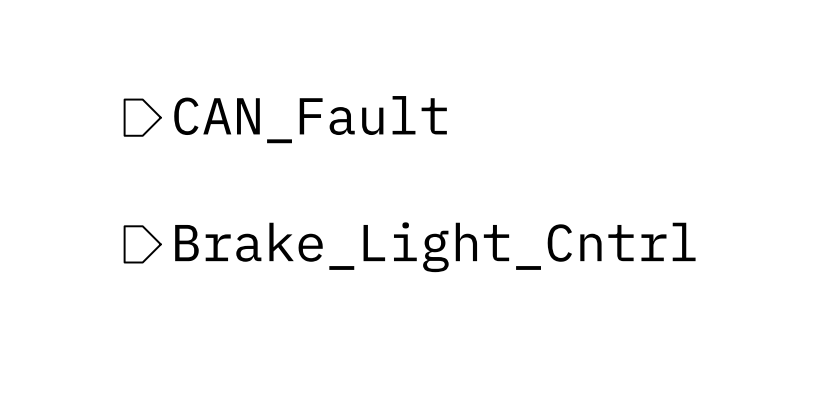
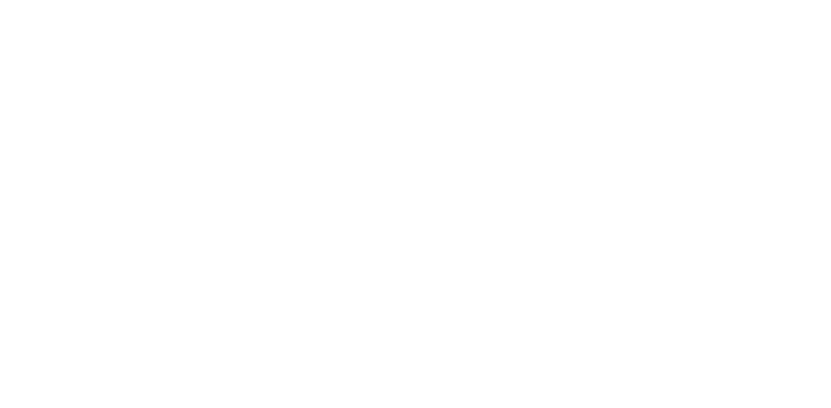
hierarchical label: CAN_Fault (310, 119) -> none
hierarchical label: Brake_Light_Cntrl (435, 247) -> none

